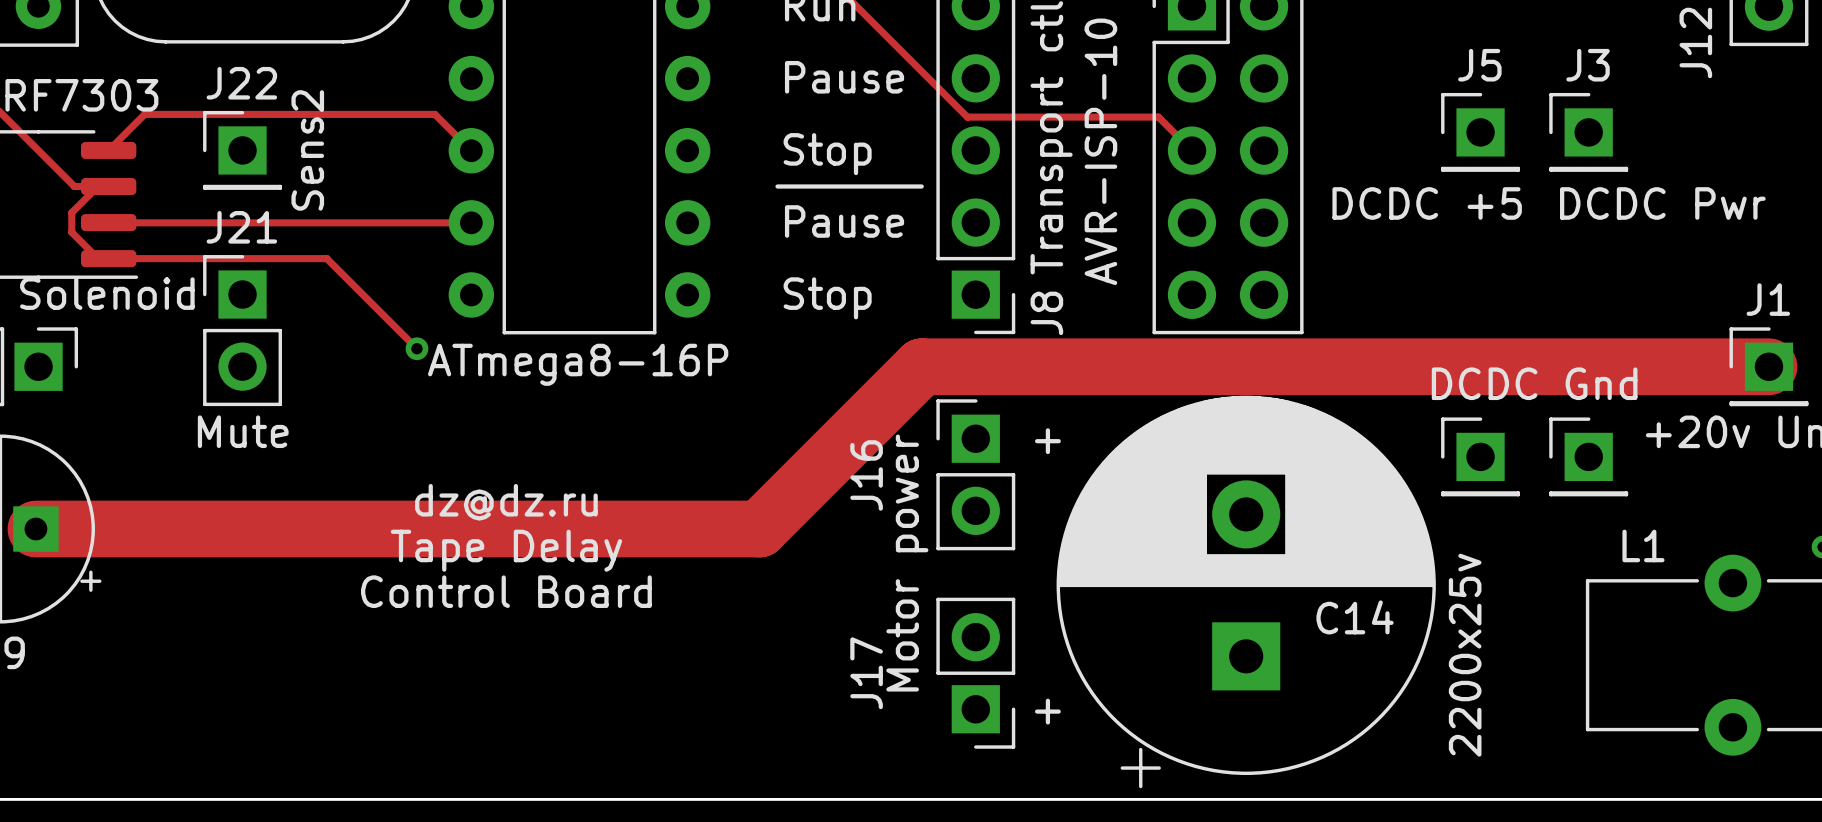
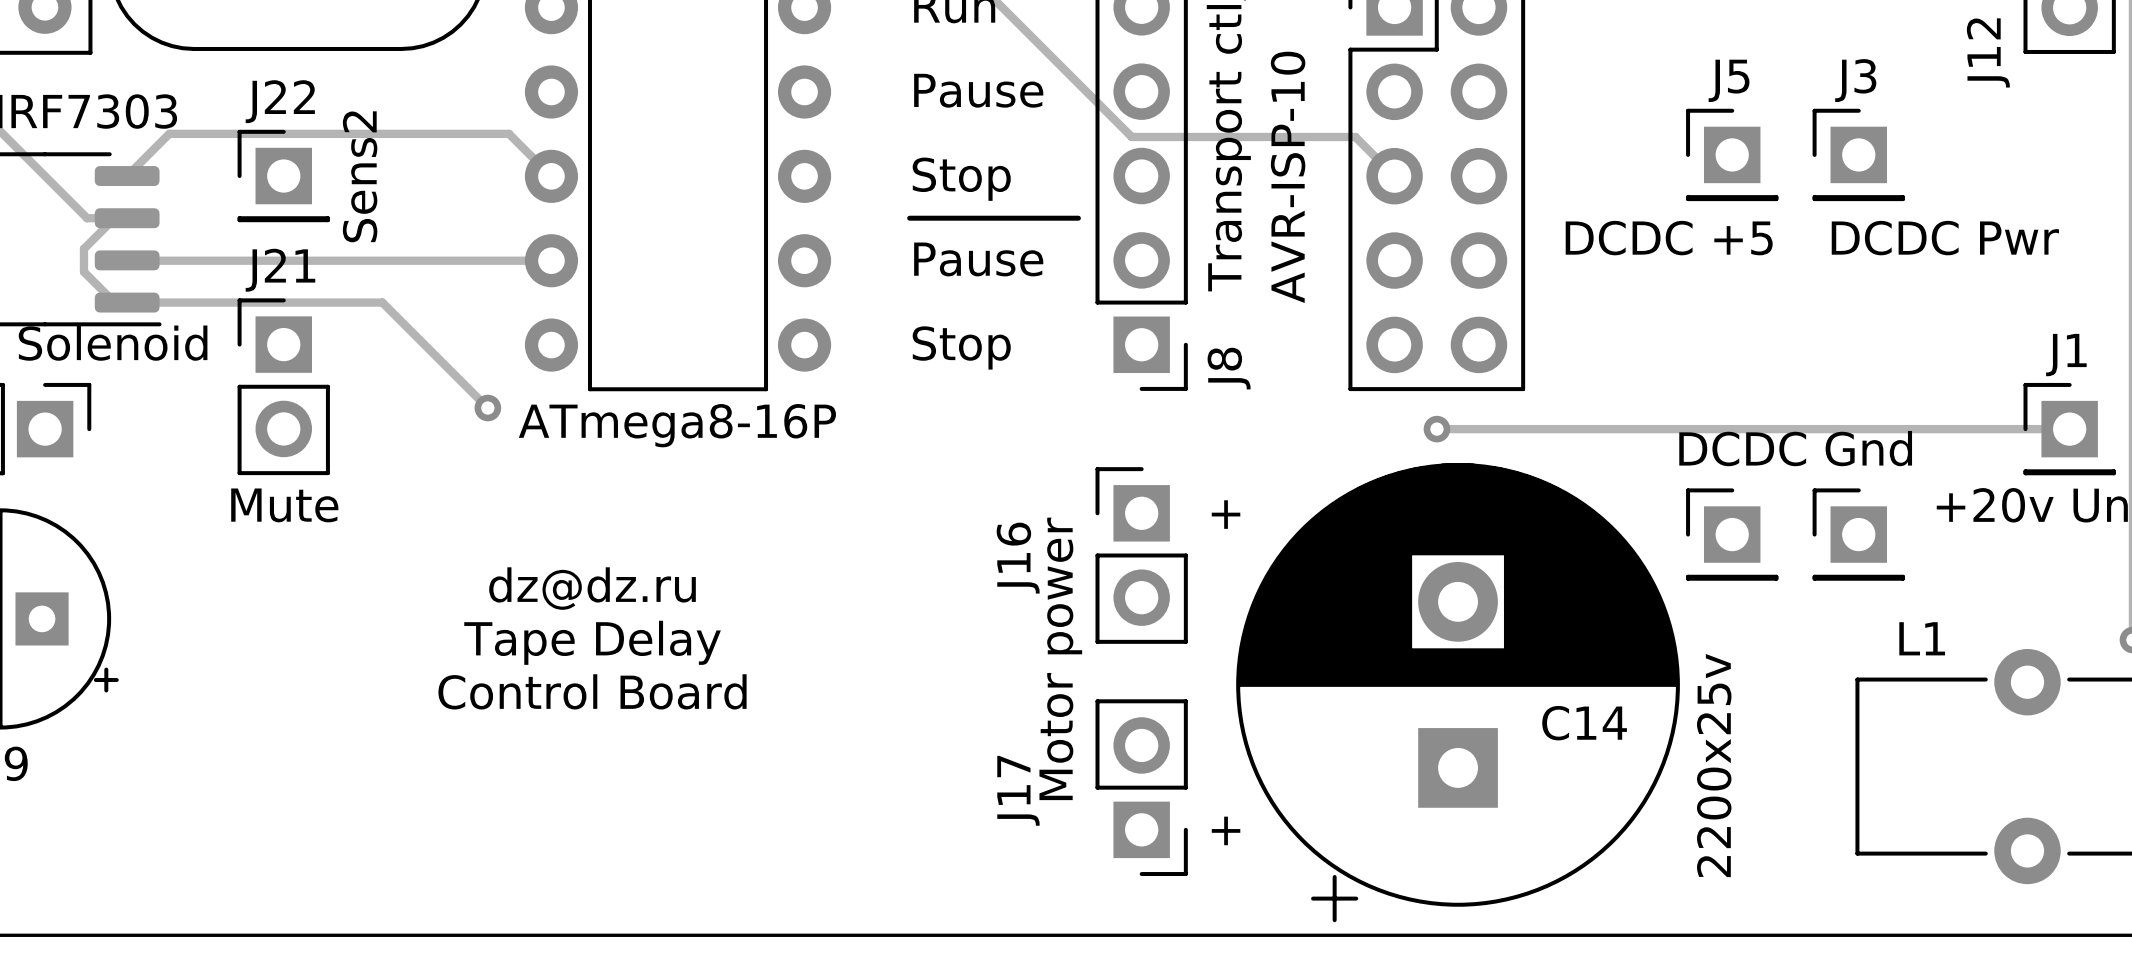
track: (1228, 366) (921, 366) (759, 529) (35, 529) -> none
track width: thick (1228, 366) (1768, 366) -> thin (1436, 429) (2069, 429)
via: none -> (1436, 429)

